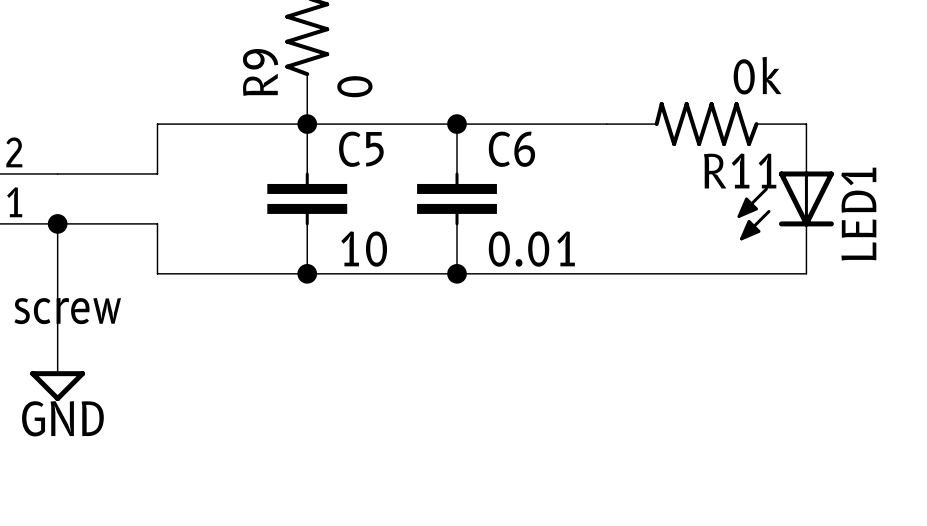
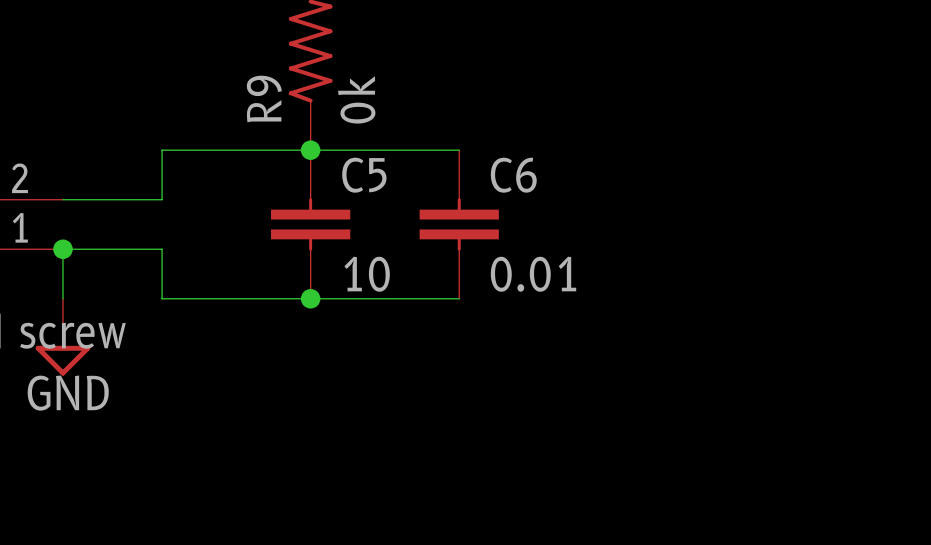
R9 value: 0 (354, 86) -> 0k (356, 99)
wire: (457, 124) (606, 124) -> none
junction: (457, 124) -> none
R11: 0k (706, 124) -> none
LED1: (785, 198) -> none
wire: (457, 273) (806, 273) -> none
junction: (457, 273) -> none
power symbol position: GND (57, 362) -> GND (62, 337)

